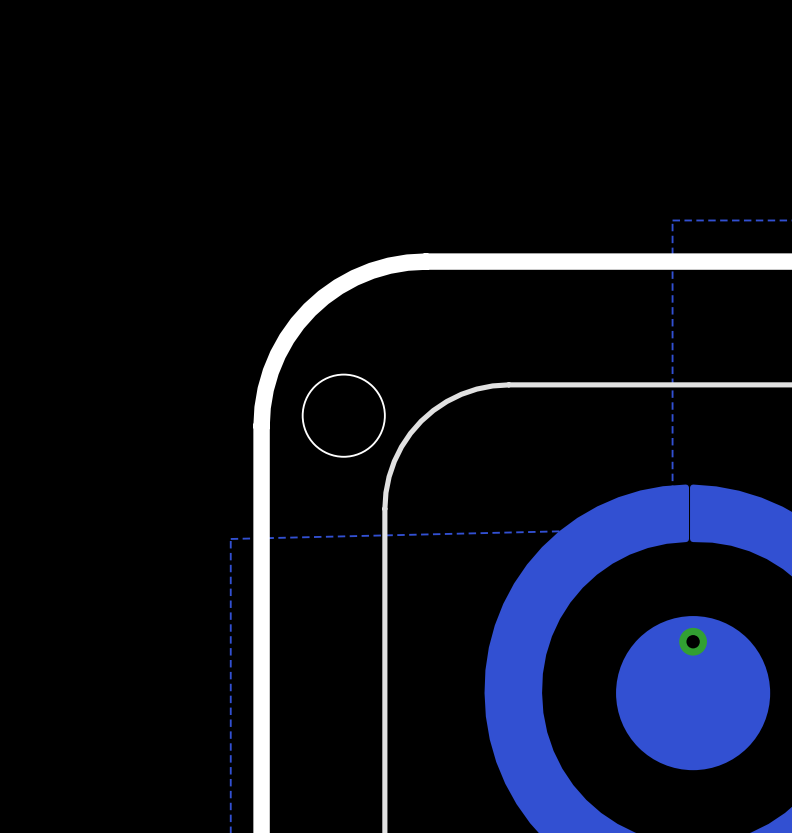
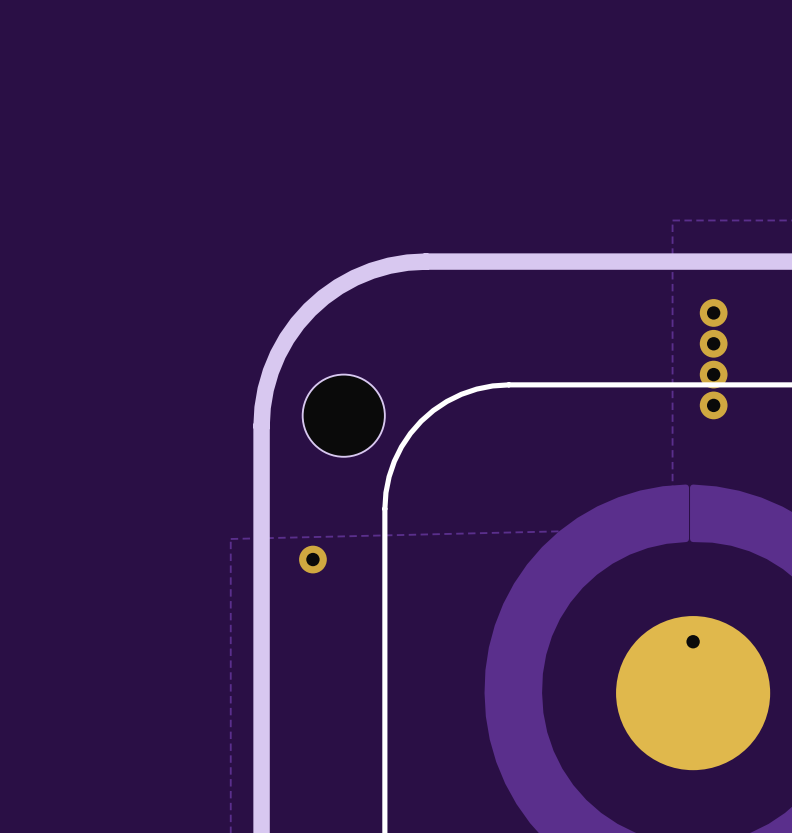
via: none -> (713, 312)
via: none -> (713, 343)
via: none -> (713, 374)
via: none -> (713, 405)
via: none -> (312, 559)

